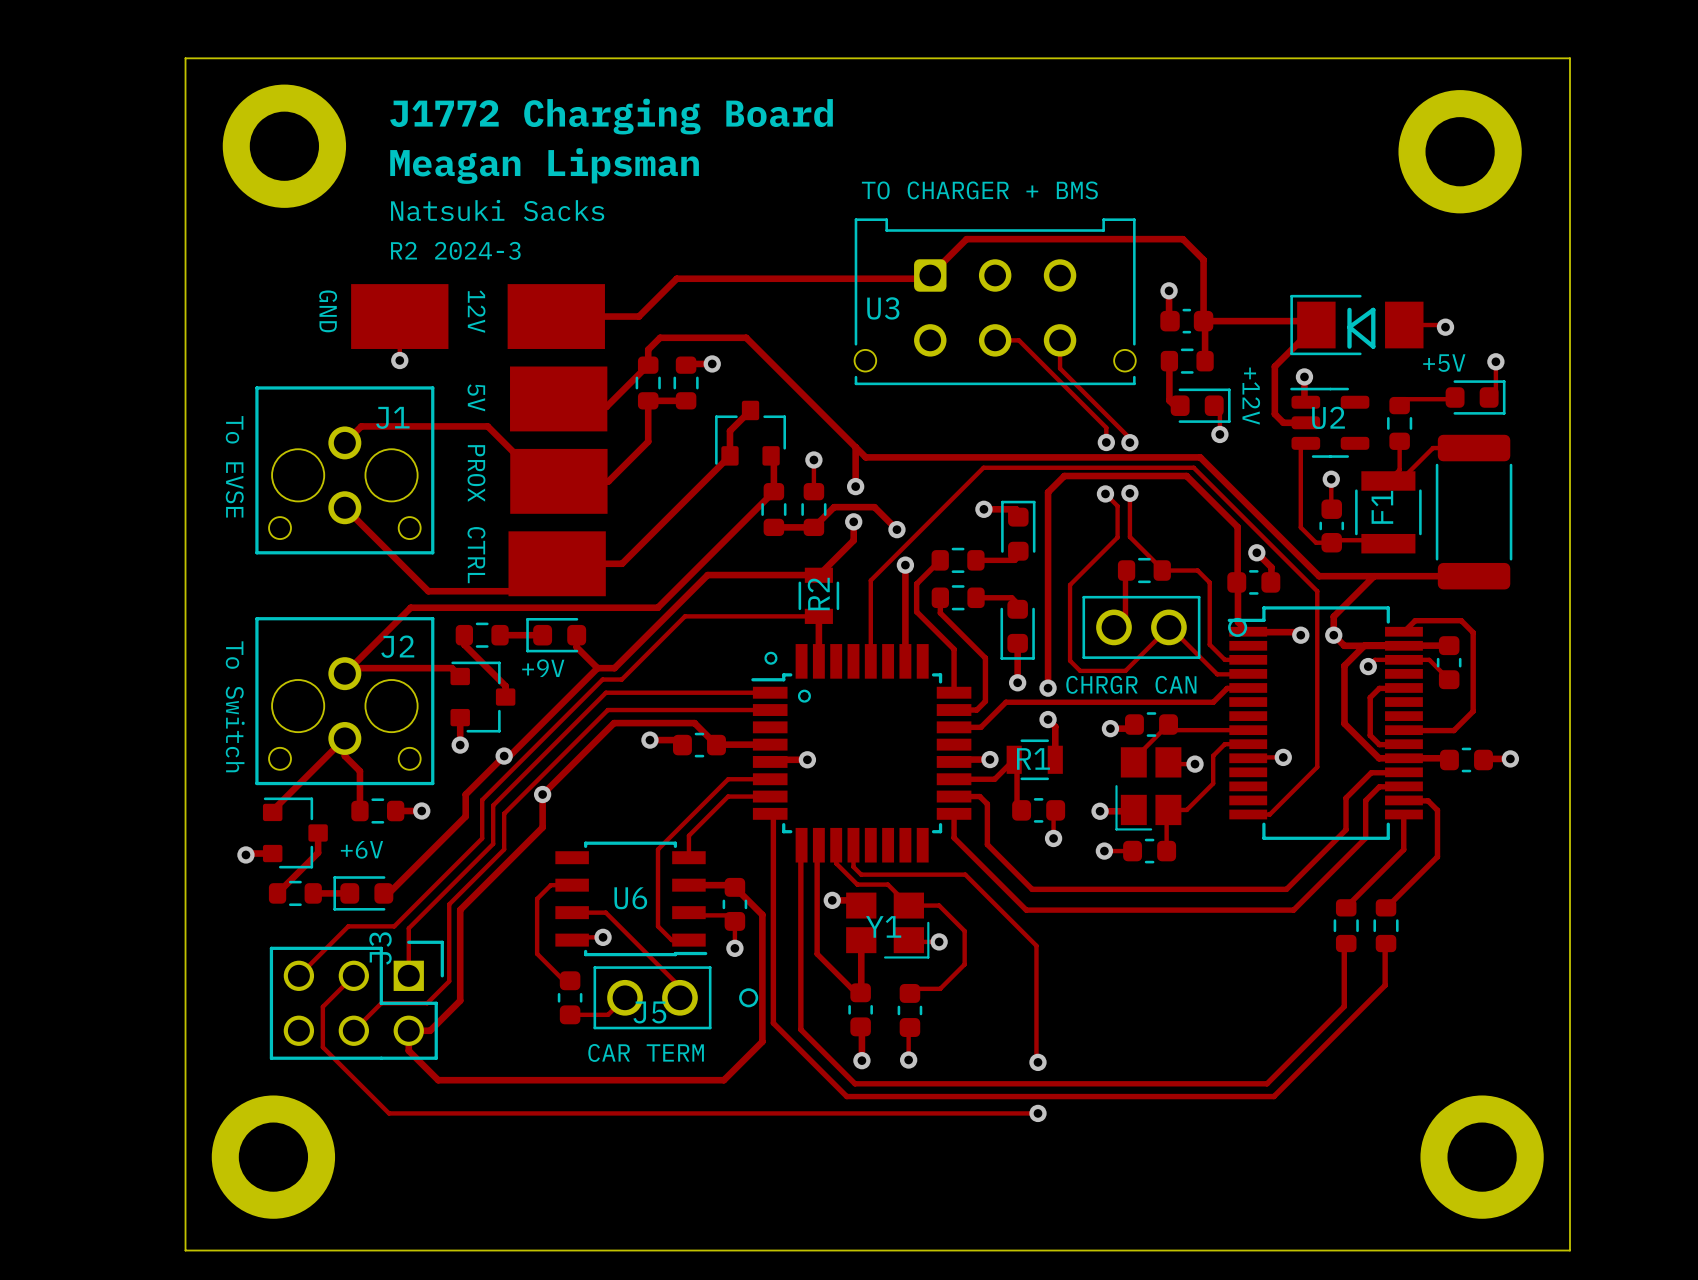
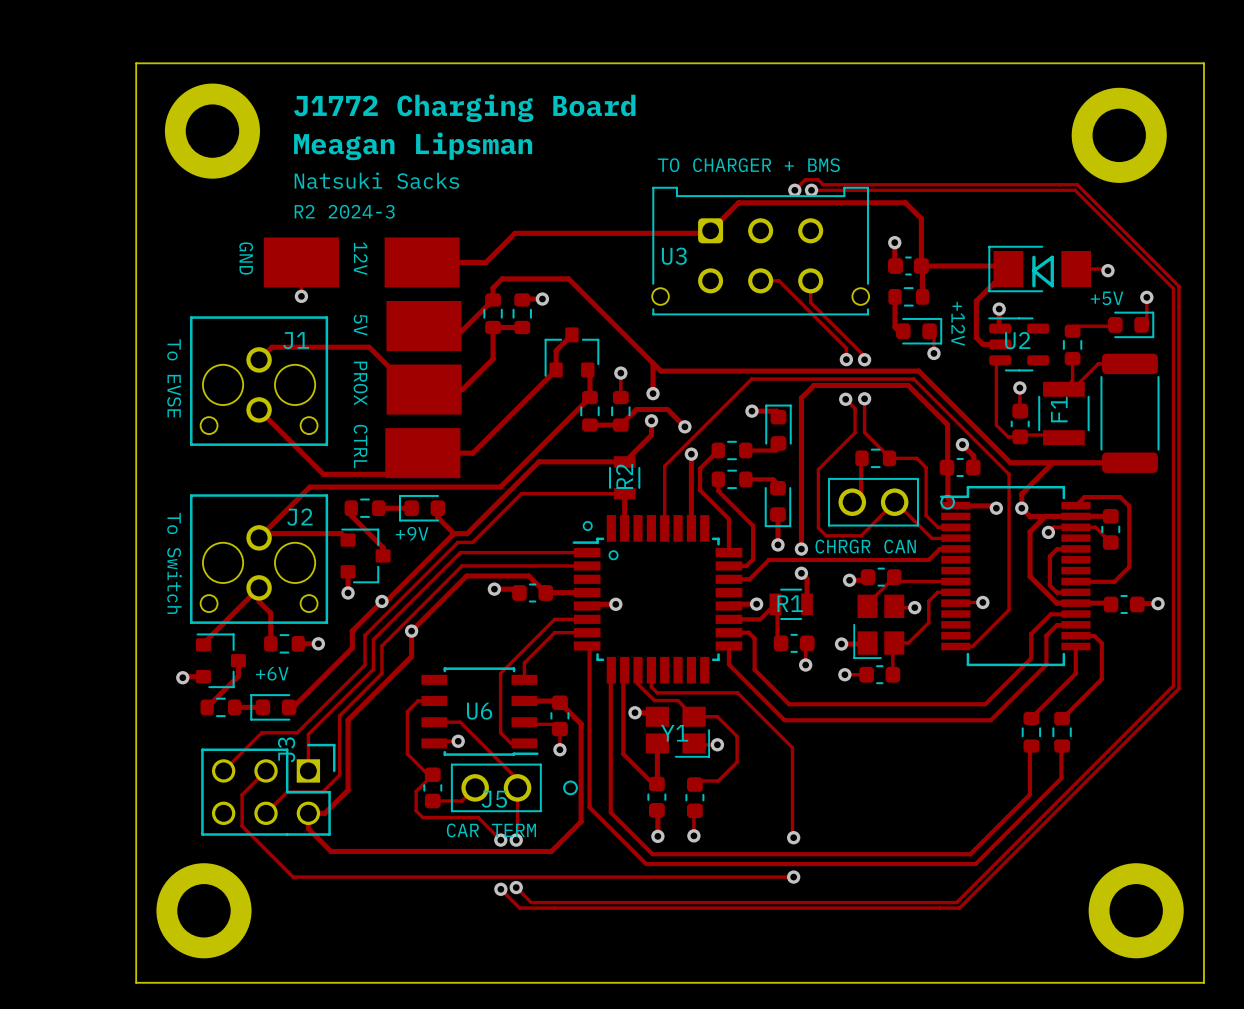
track: none -> (794, 190) (805, 179) (818, 179) (823, 184) (1077, 184) (1179, 286) (1179, 688) (959, 908) (519, 908) (500, 889)
via: none -> (794, 190)
track: none -> (811, 190) (1075, 190) (1173, 288) (1173, 685) (956, 902) (531, 902) (516, 887)
via: none -> (811, 190)
track: none -> (432, 774) (416, 791) (416, 810) (422, 817) (478, 817) (500, 840)
track: none -> (517, 787) (516, 840)
via: none -> (500, 840)
via: none -> (516, 840)
via: none -> (516, 887)
via: none -> (500, 889)

